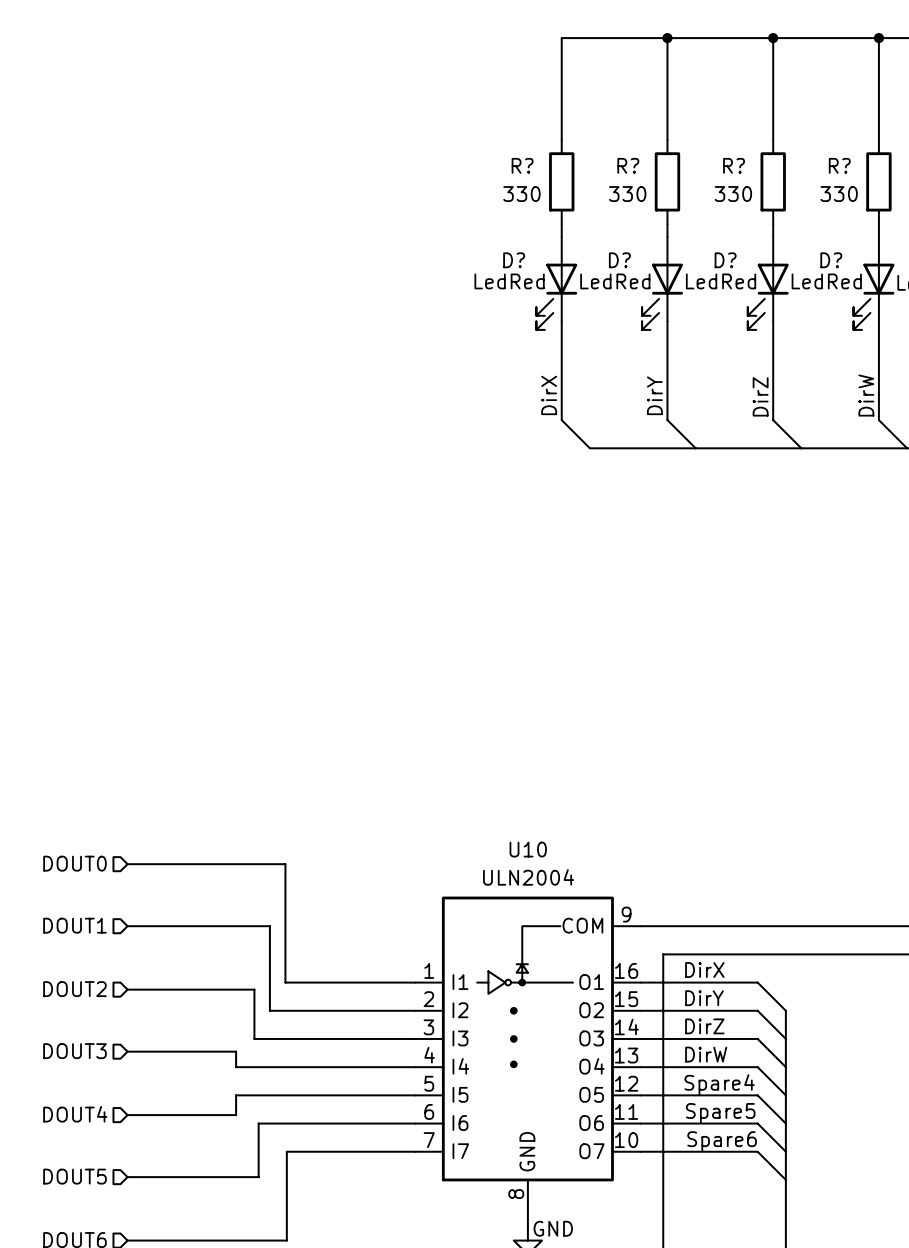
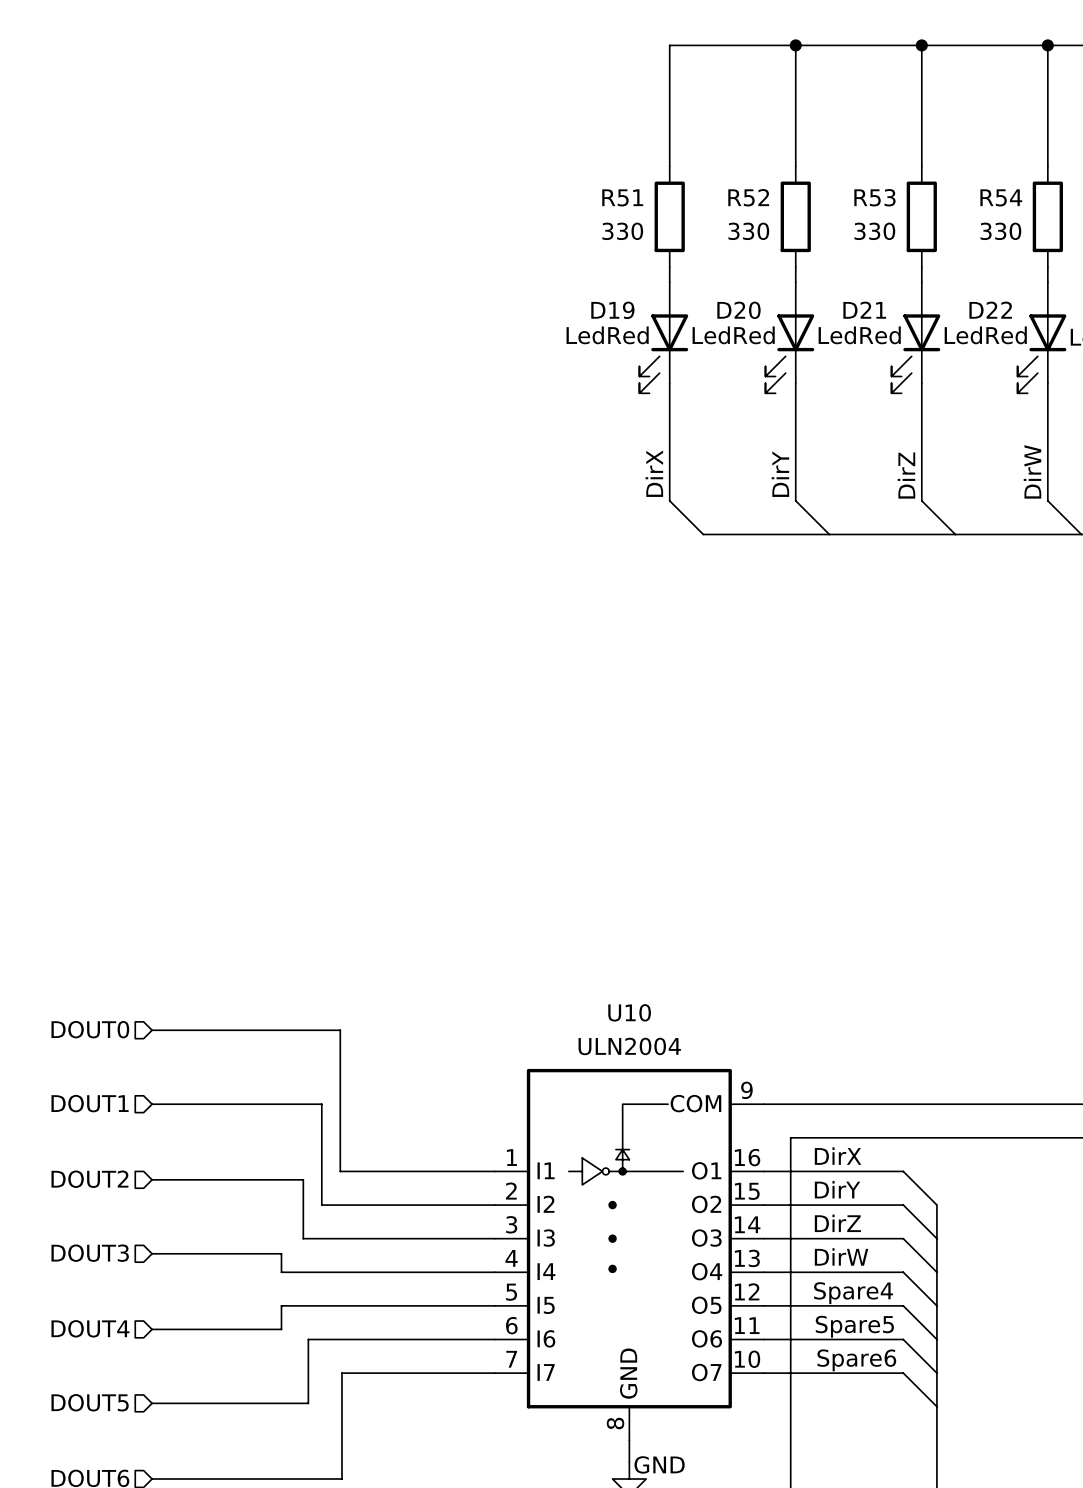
R? name: R? (522, 165) -> R51 (622, 197)
R? name: R? (628, 165) -> R52 (748, 197)
R? name: R? (734, 165) -> R53 (874, 197)
R? name: R? (839, 165) -> R54 (1001, 197)
D? name: D? (514, 260) -> D19 (612, 310)
D? name: D? (619, 260) -> D20 (738, 310)
D? name: D? (725, 260) -> D21 (864, 310)
D? name: D? (831, 260) -> D22 (990, 310)

